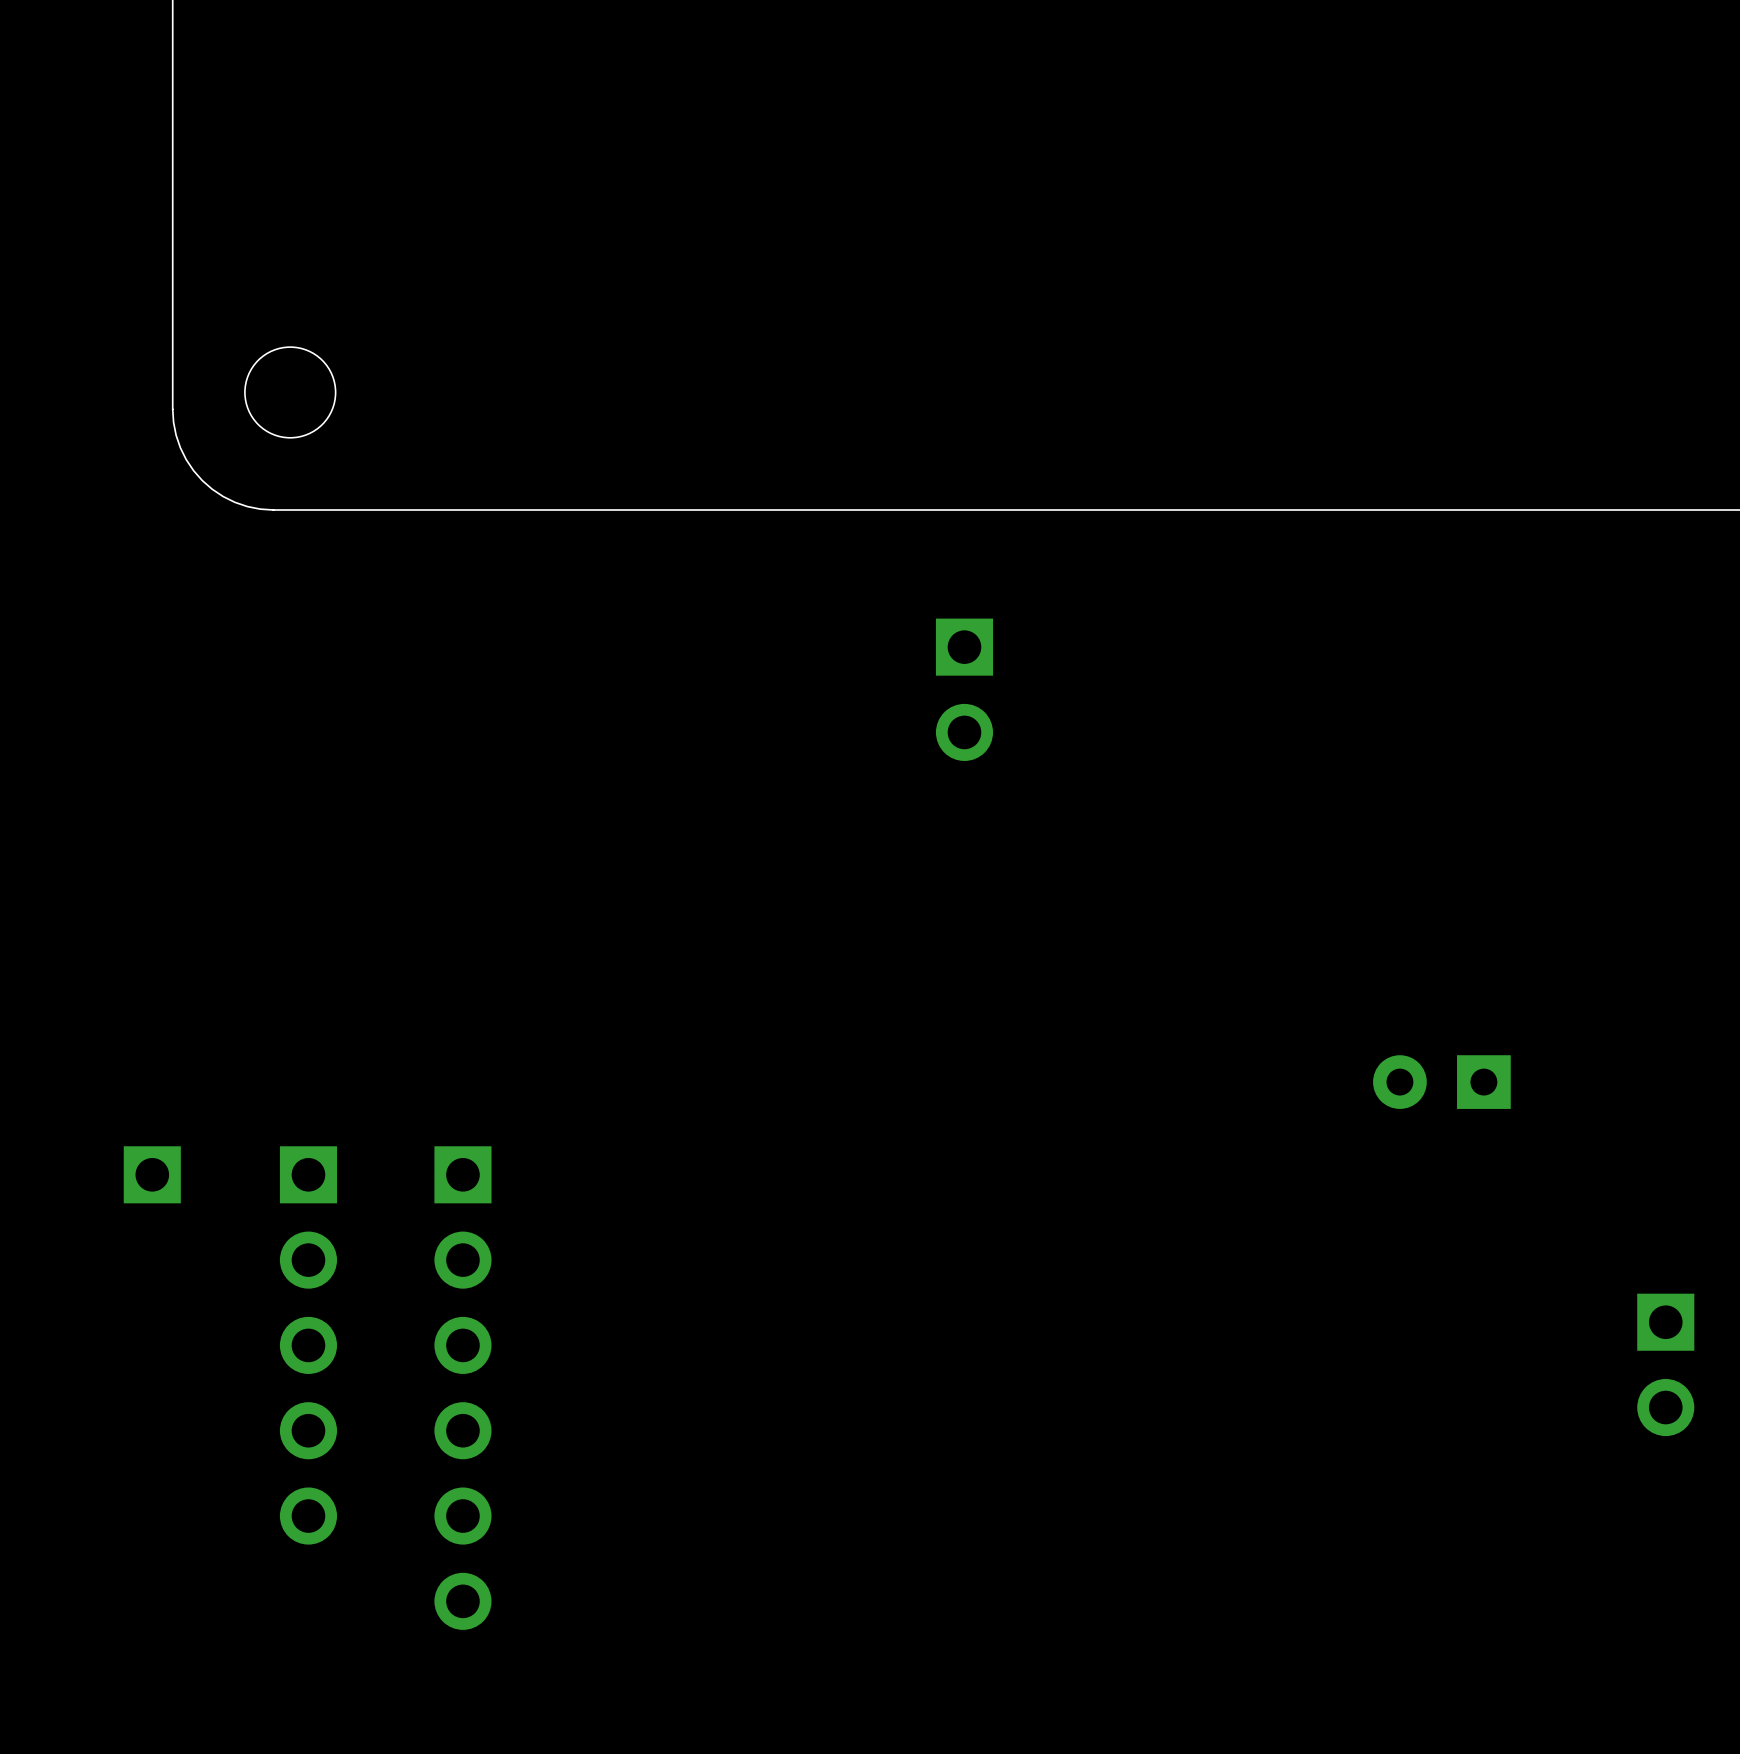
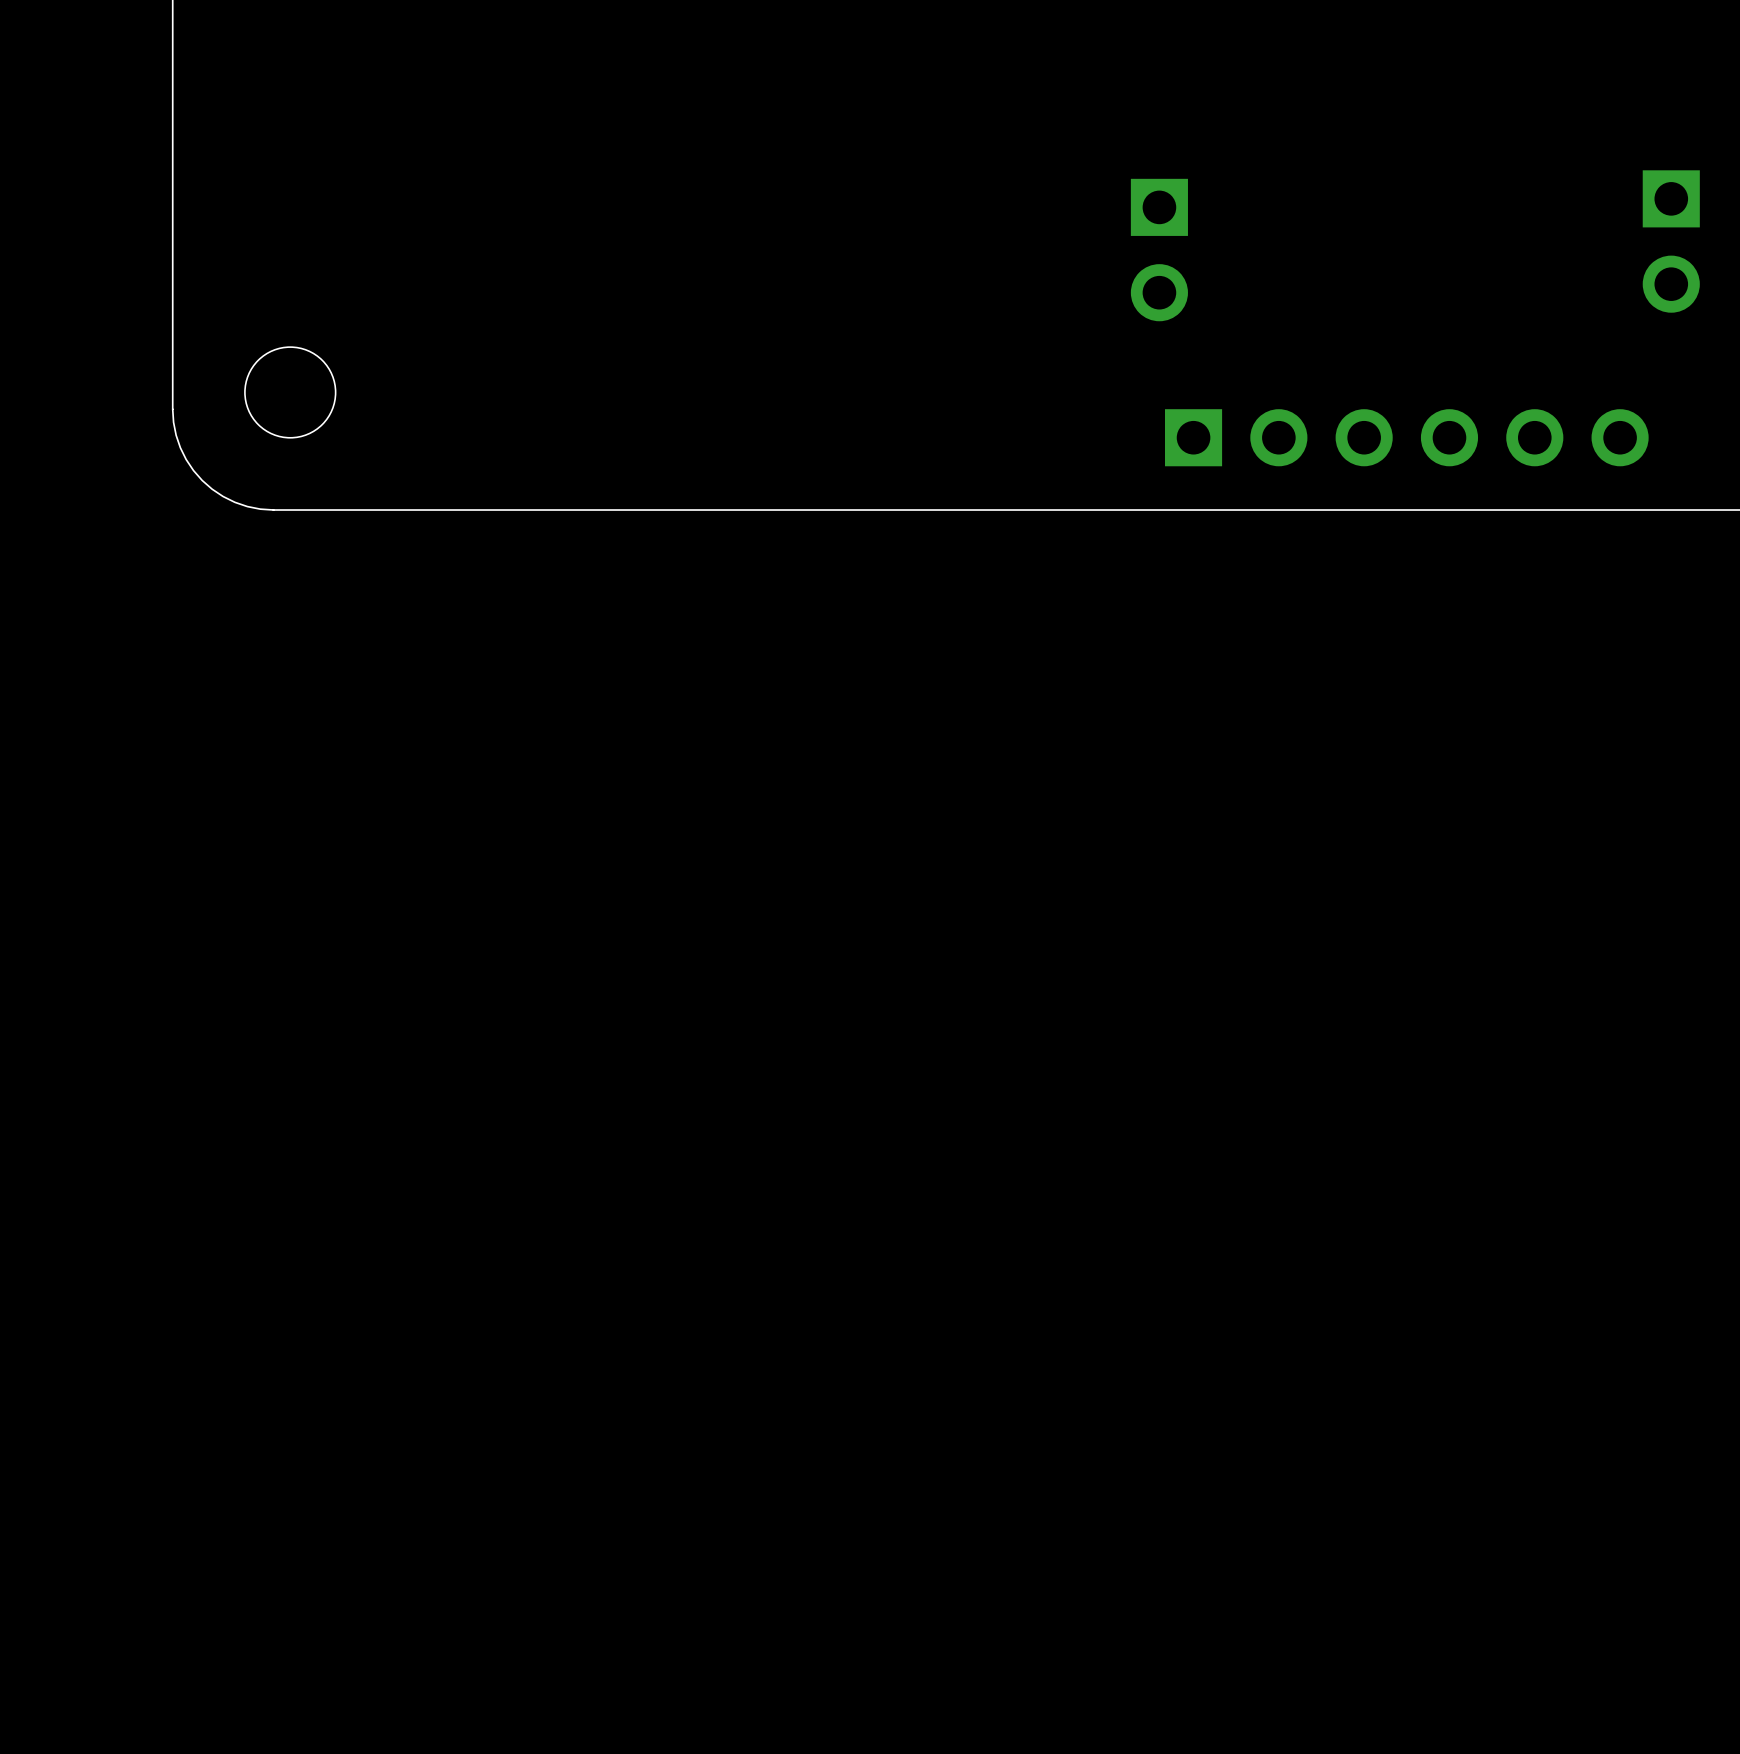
part: none -> (1671, 241)
part: none -> (1159, 250)
part: none -> (1406, 437)
part: (964, 689) -> none
part: (1441, 1082) -> none
part: (152, 1174) -> none
part: (308, 1345) -> none
part: (1665, 1364) -> none
part: (462, 1388) -> none

